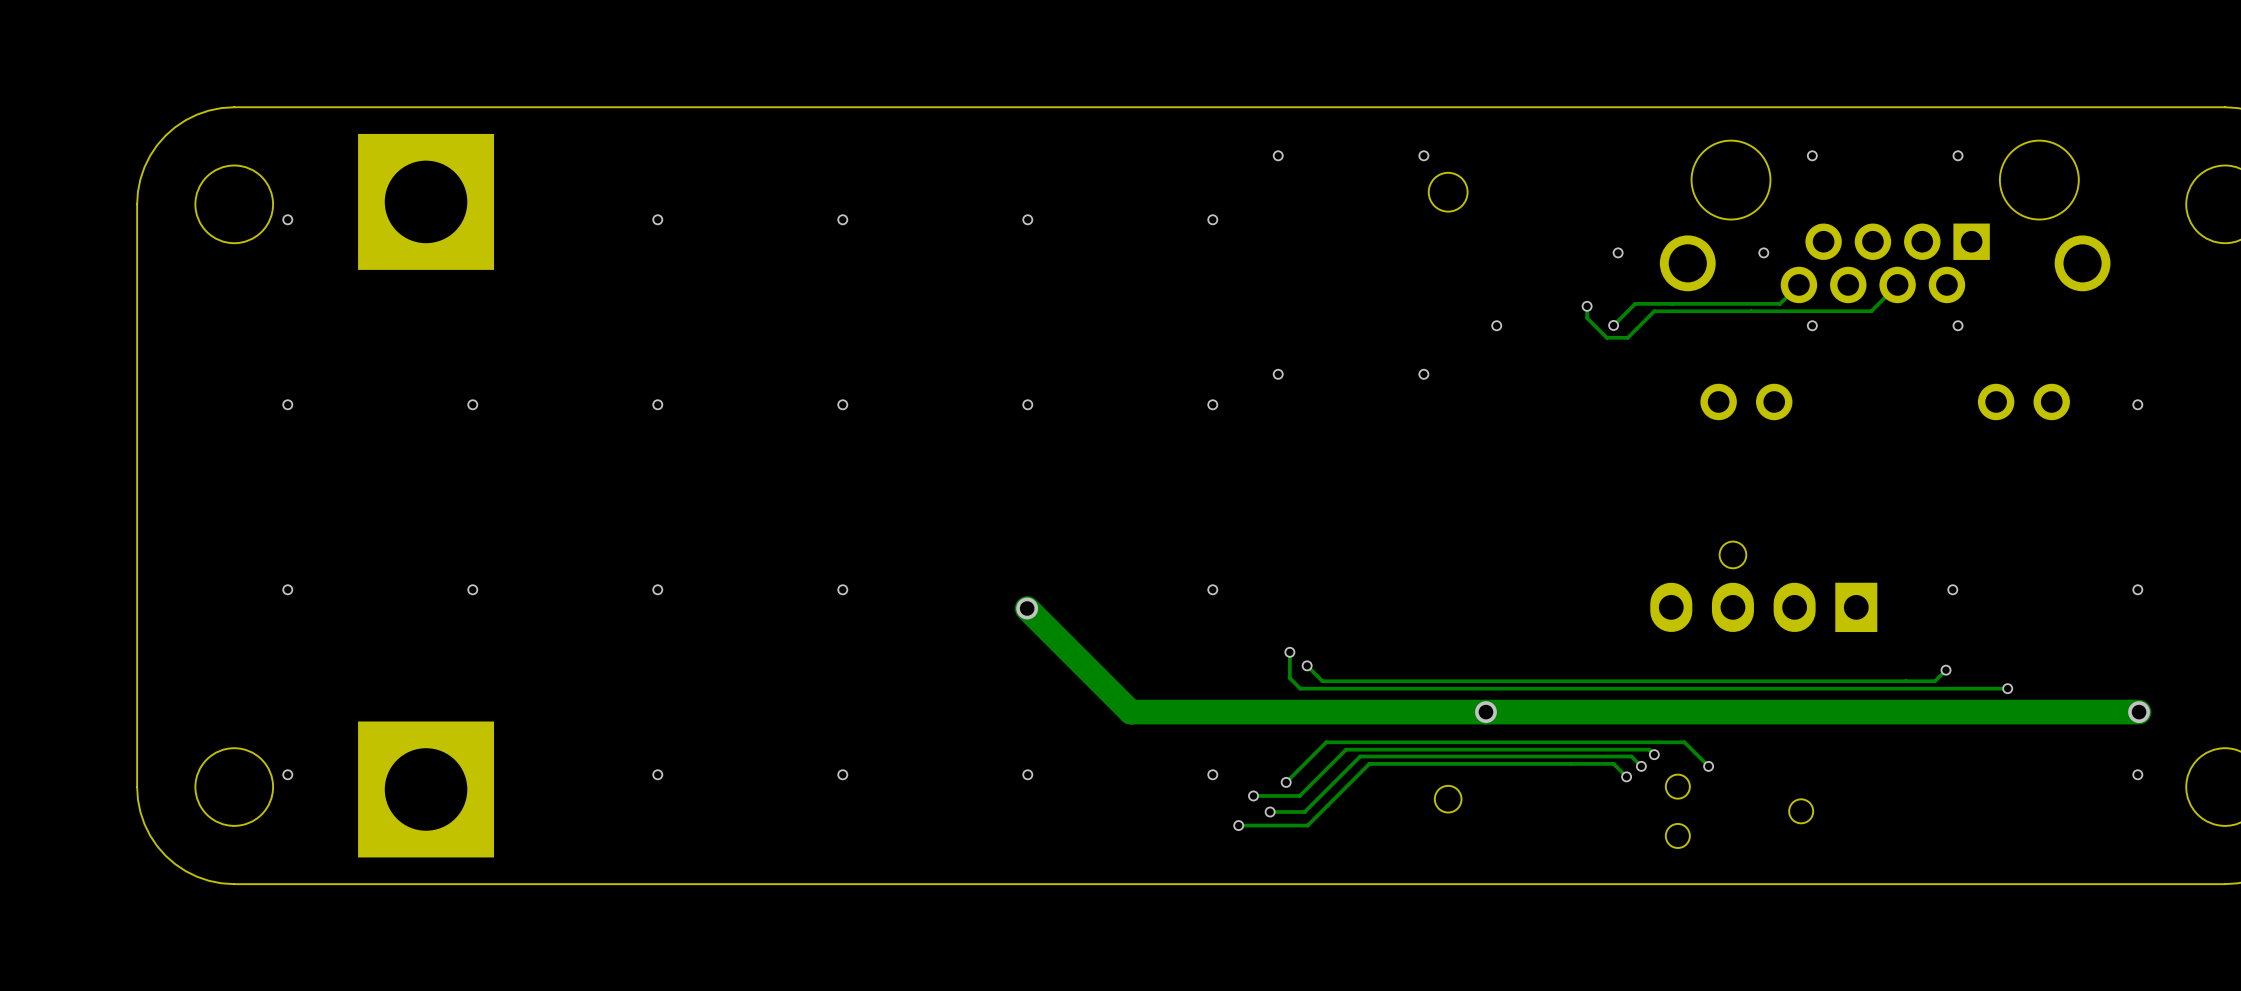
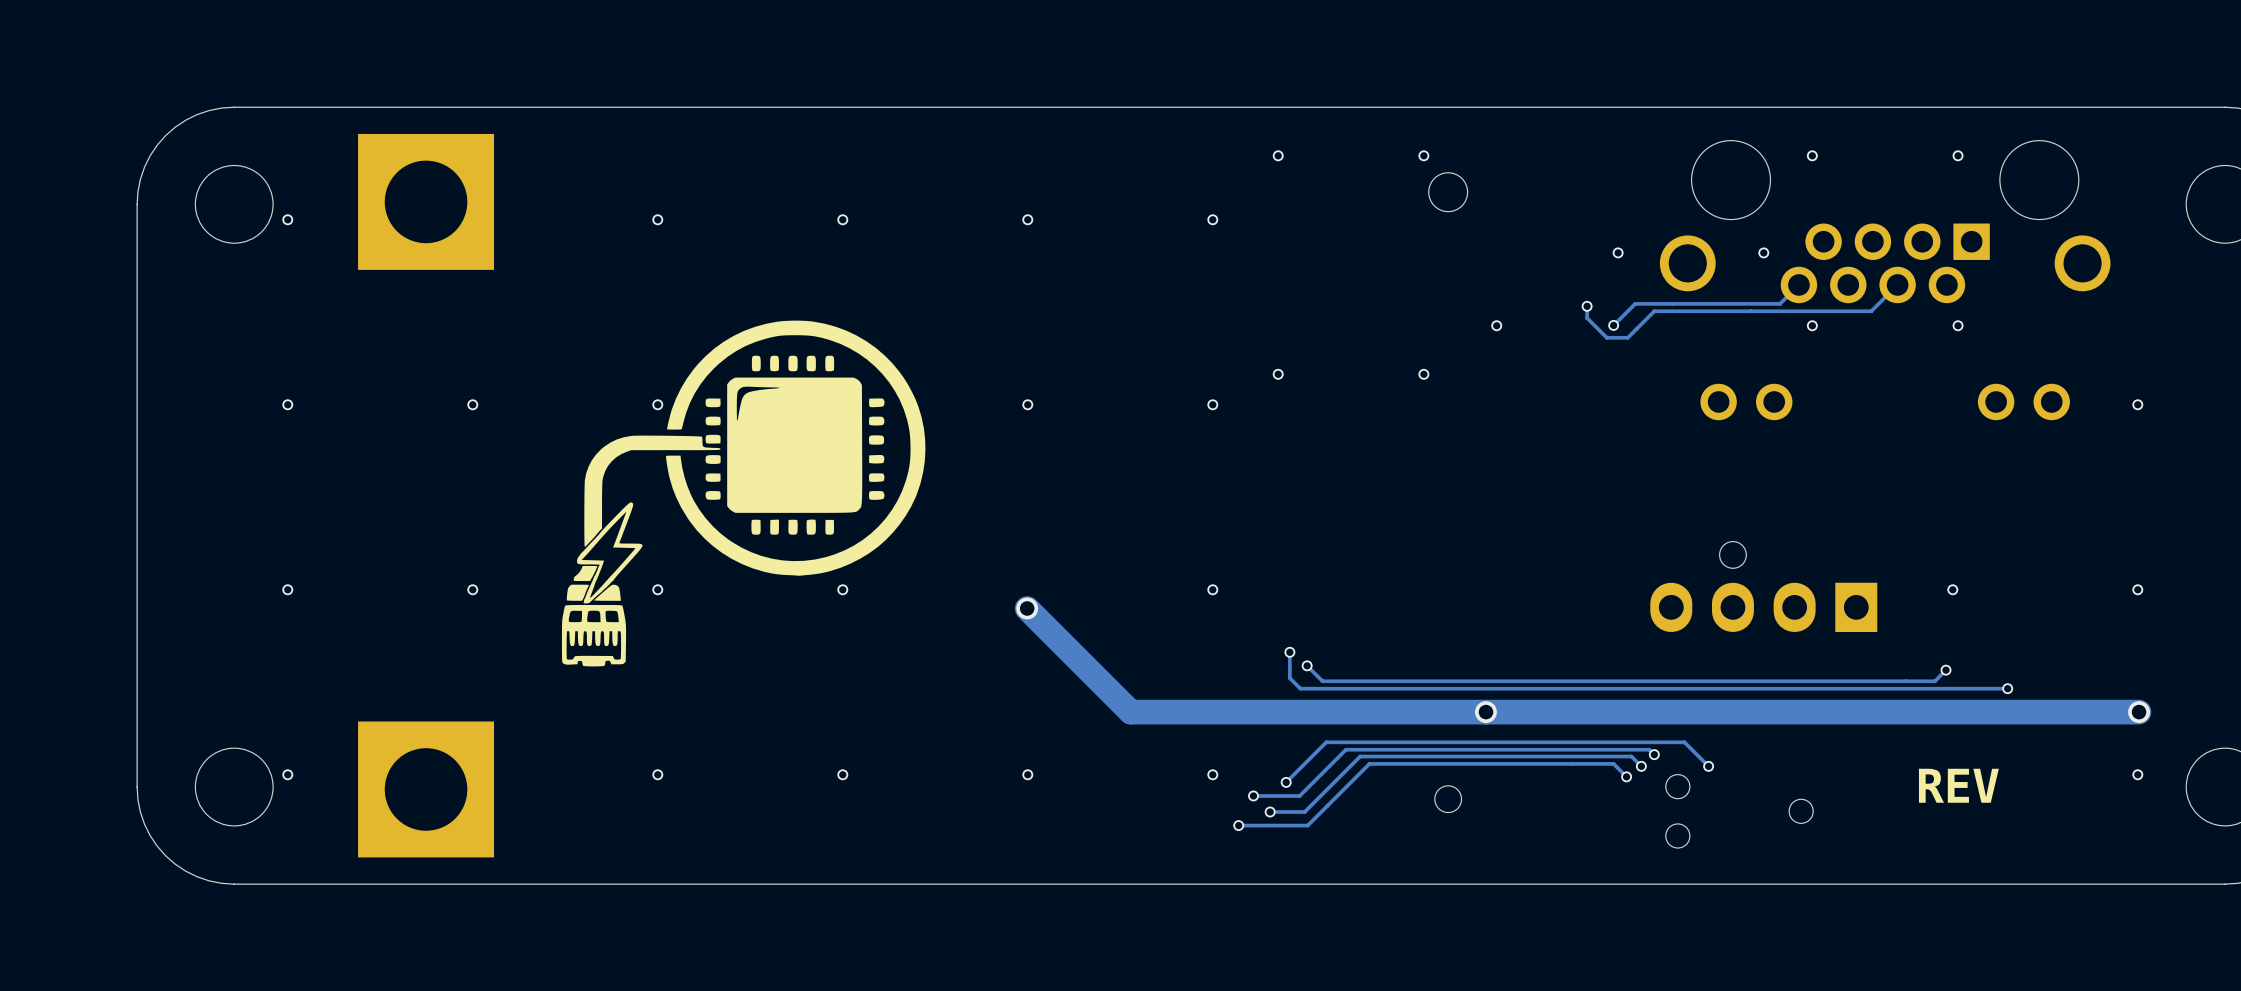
drawing: none -> [561, 320, 926, 667]
text: none -> REV (1958, 785)

